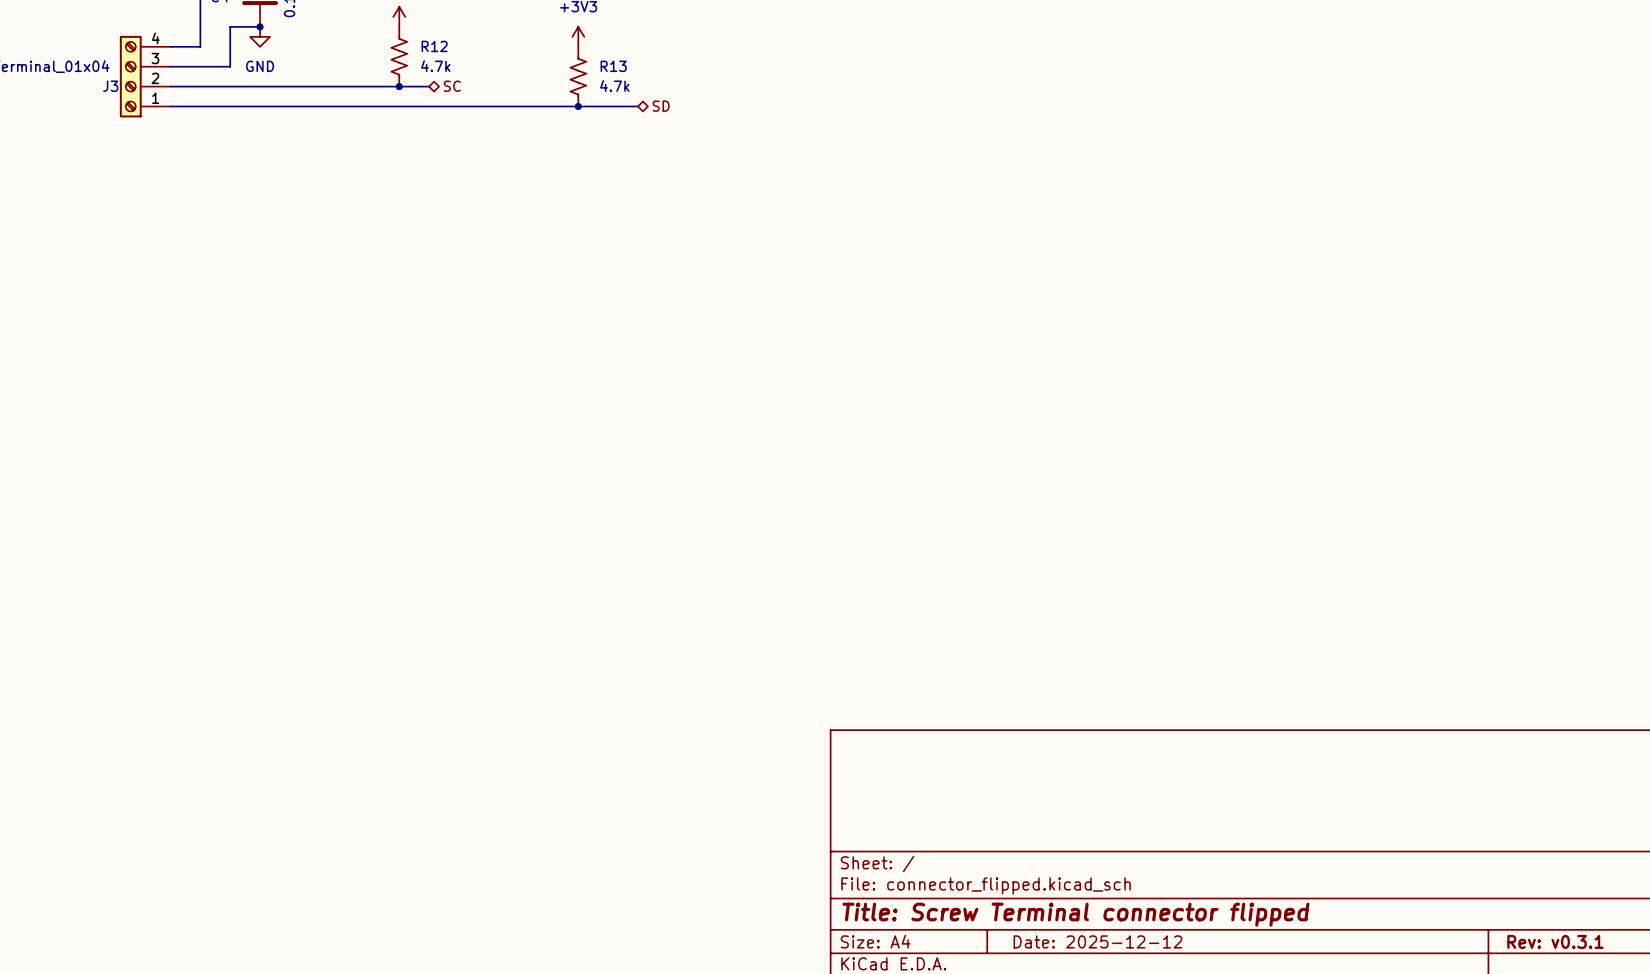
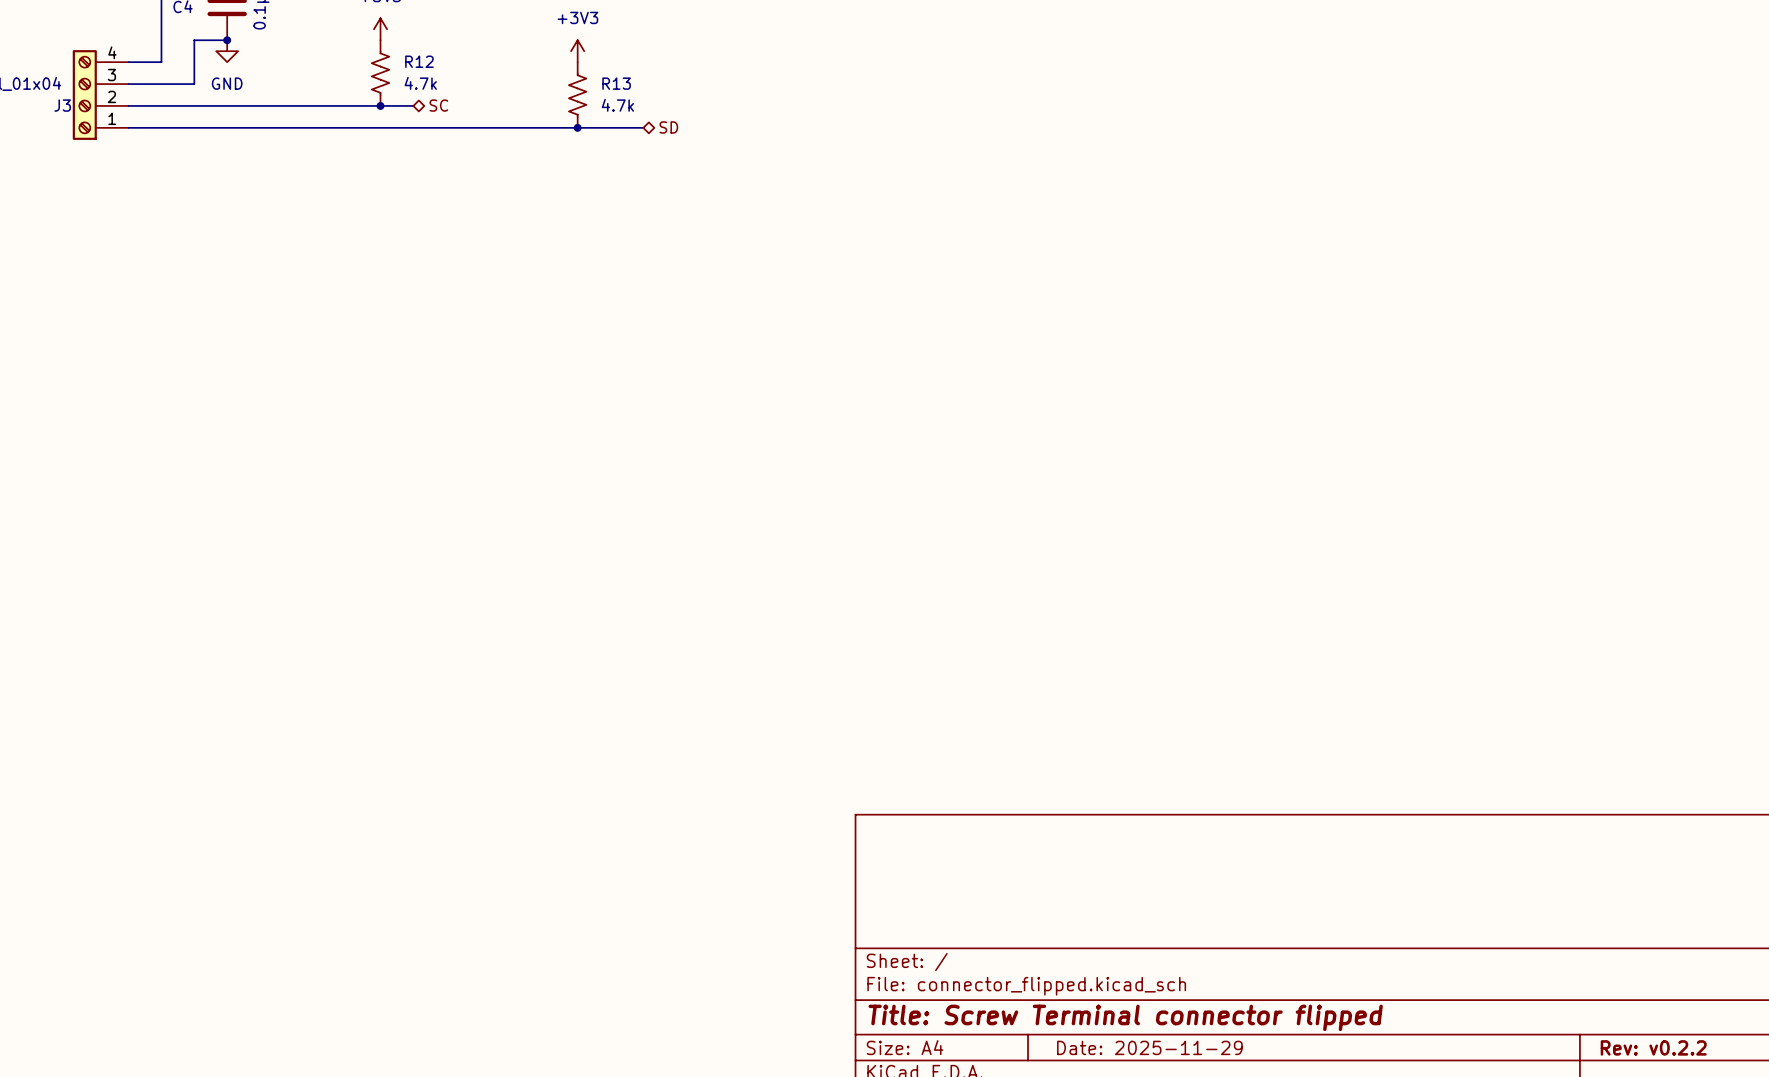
title block: Date: 2025-12-12 (1097, 941) -> Date: 2025-11-29 (1149, 1047)
title block: Rev: v0.3.1 (1555, 941) -> Rev: v0.2.2 (1653, 1047)

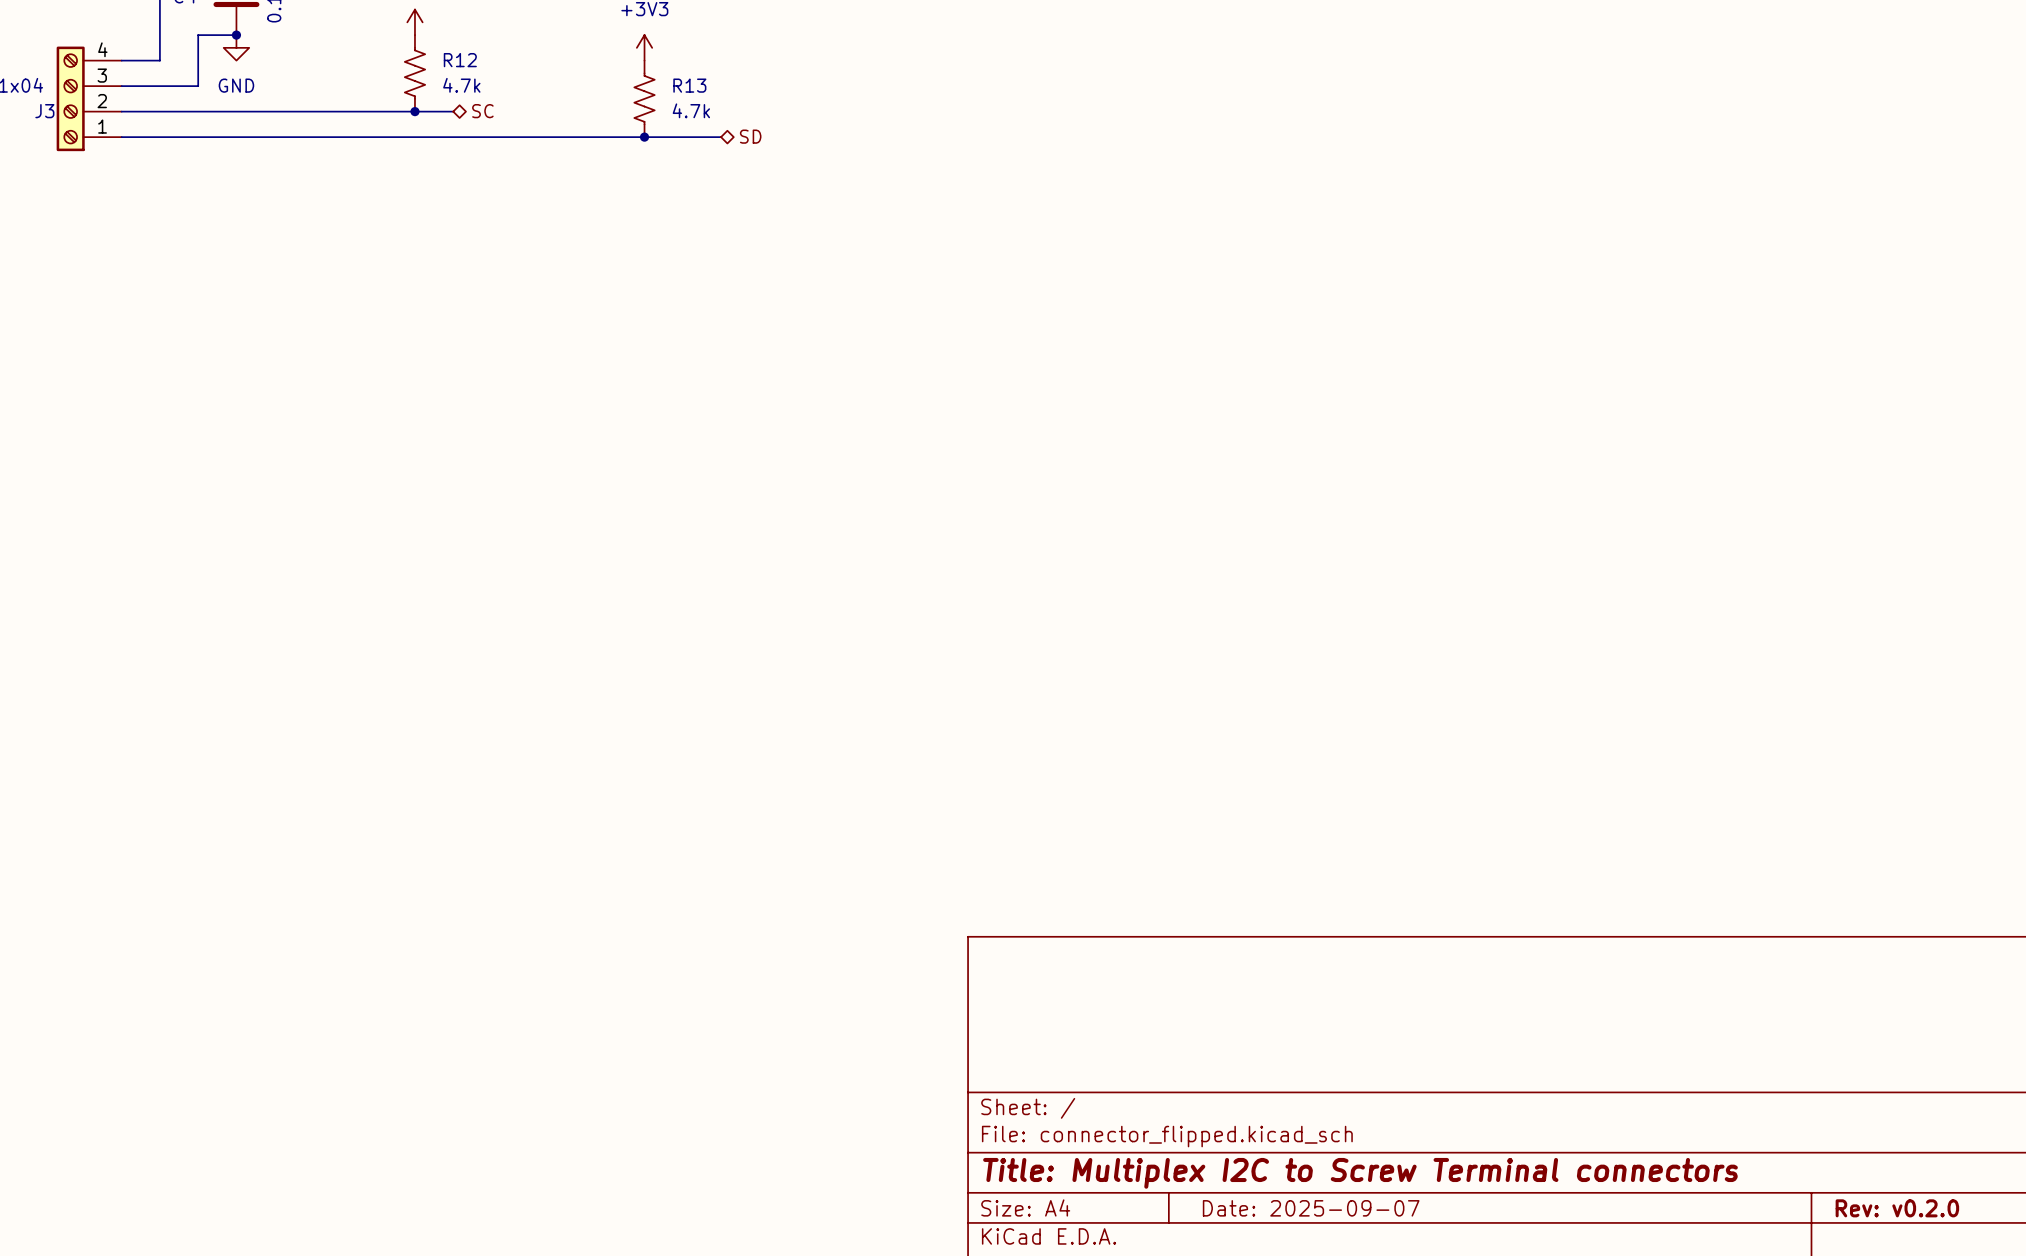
title block: Title: Screw Terminal connector flipped (1125, 1017) -> Title: Multiplex I2C to Screw Terminal connectors (1360, 1173)
title block: Date: 2025-11-29 (1149, 1047) -> Date: 2025-09-07 (1311, 1208)
title block: Rev: v0.2.2 (1653, 1047) -> Rev: v0.2.0 (1897, 1208)

